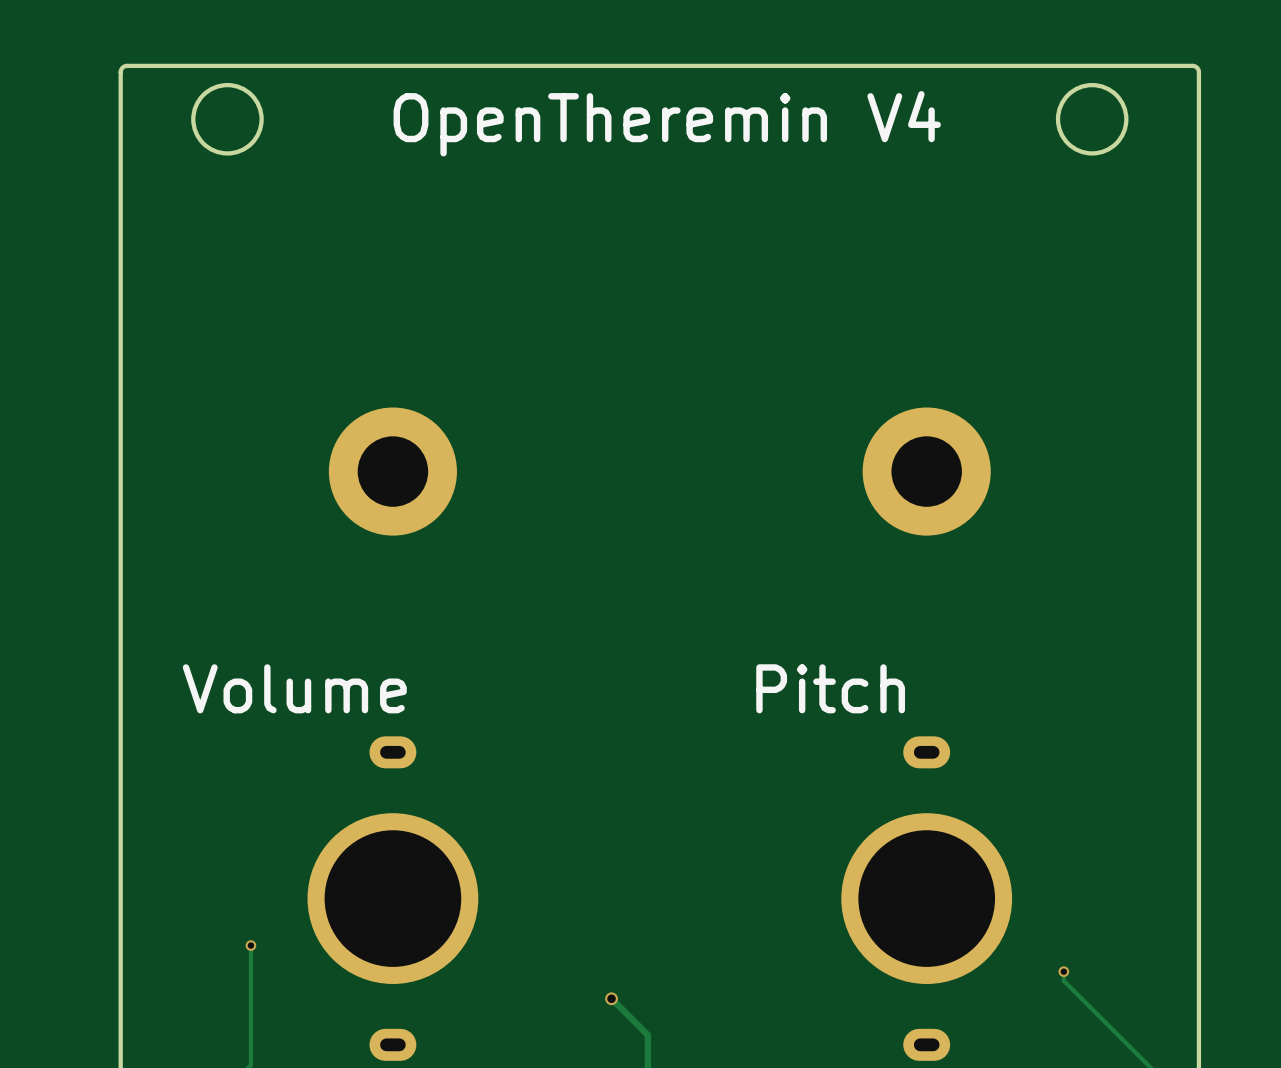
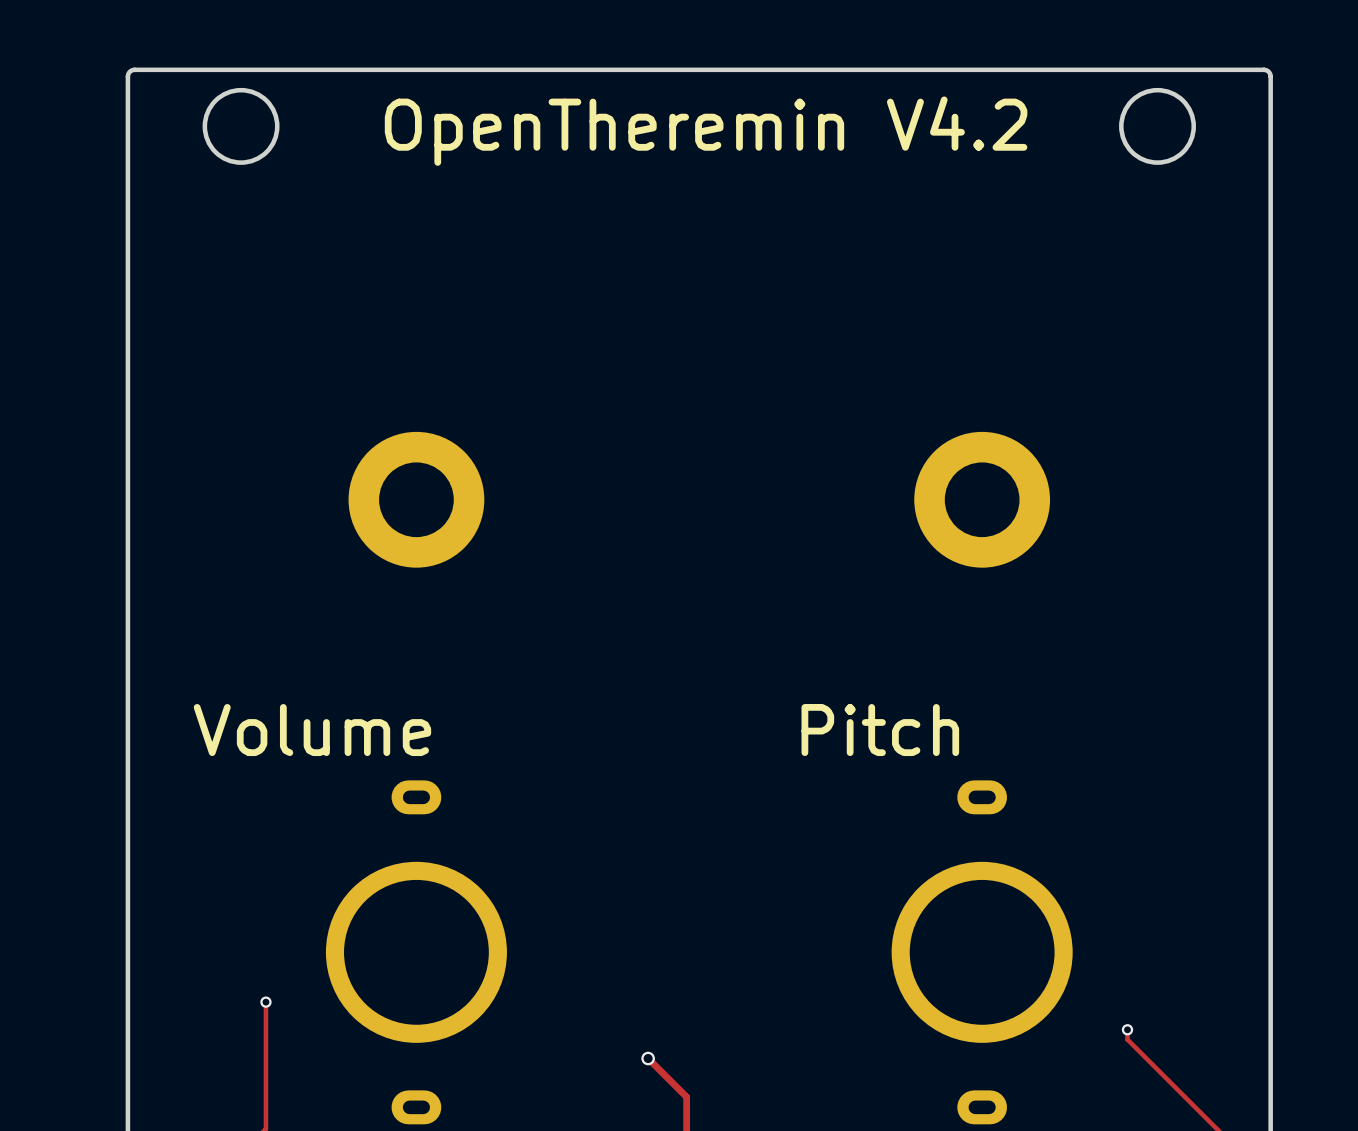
text: OpenTheremin V4 (667, 123) -> OpenTheremin V4.2 (706, 131)

